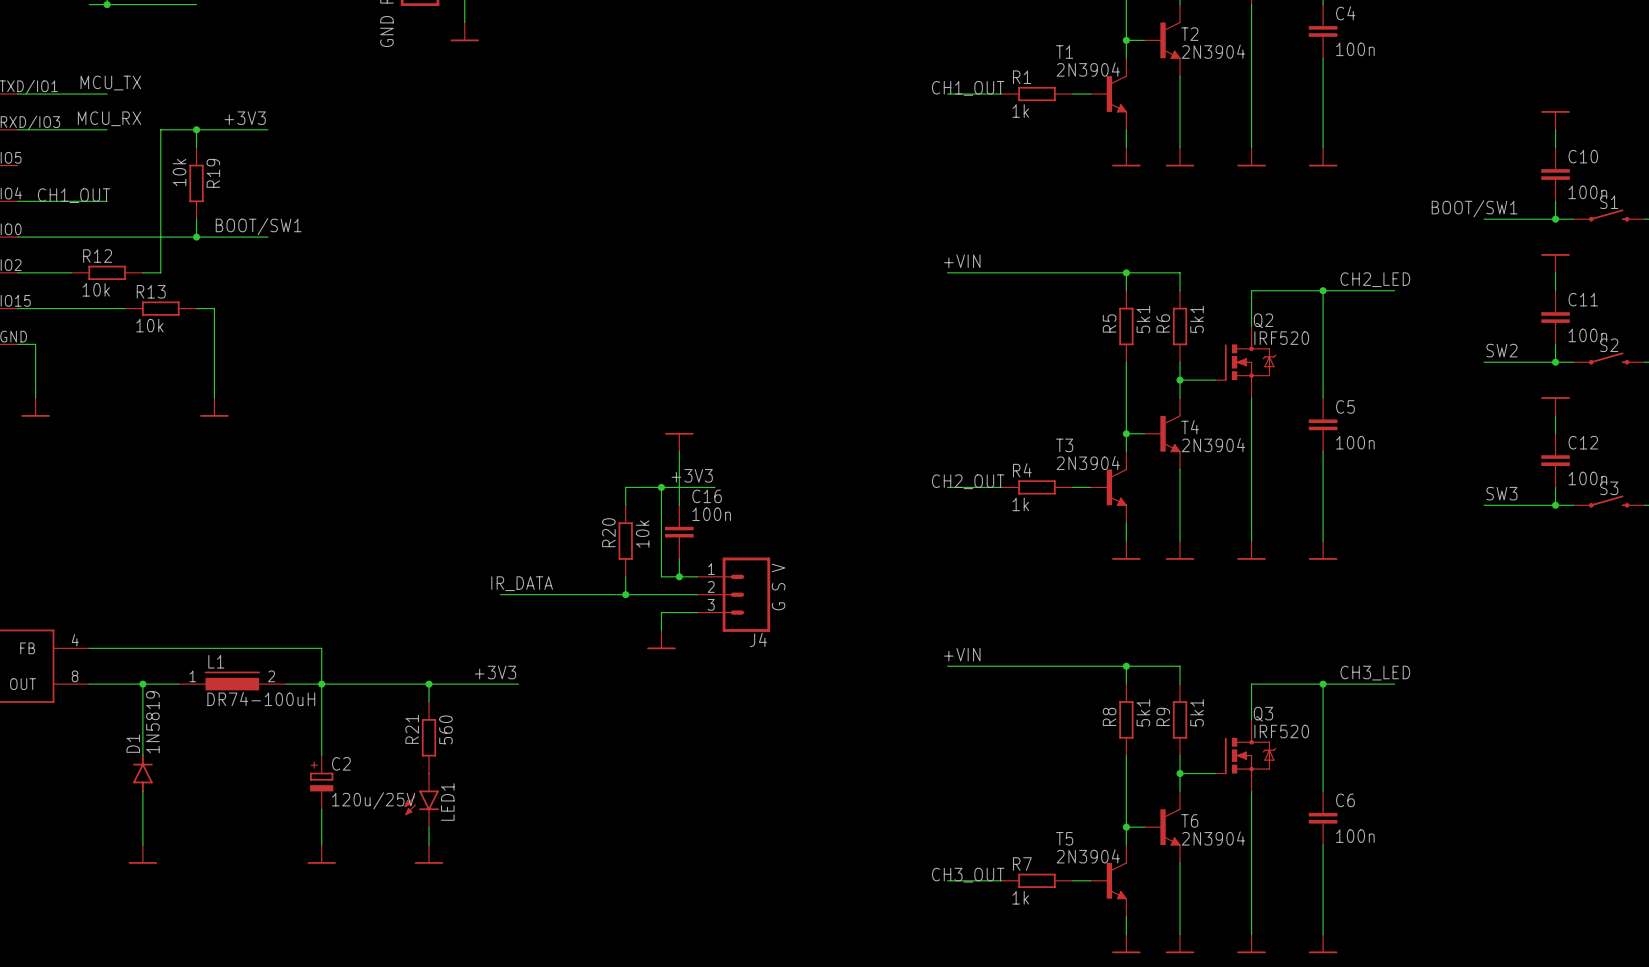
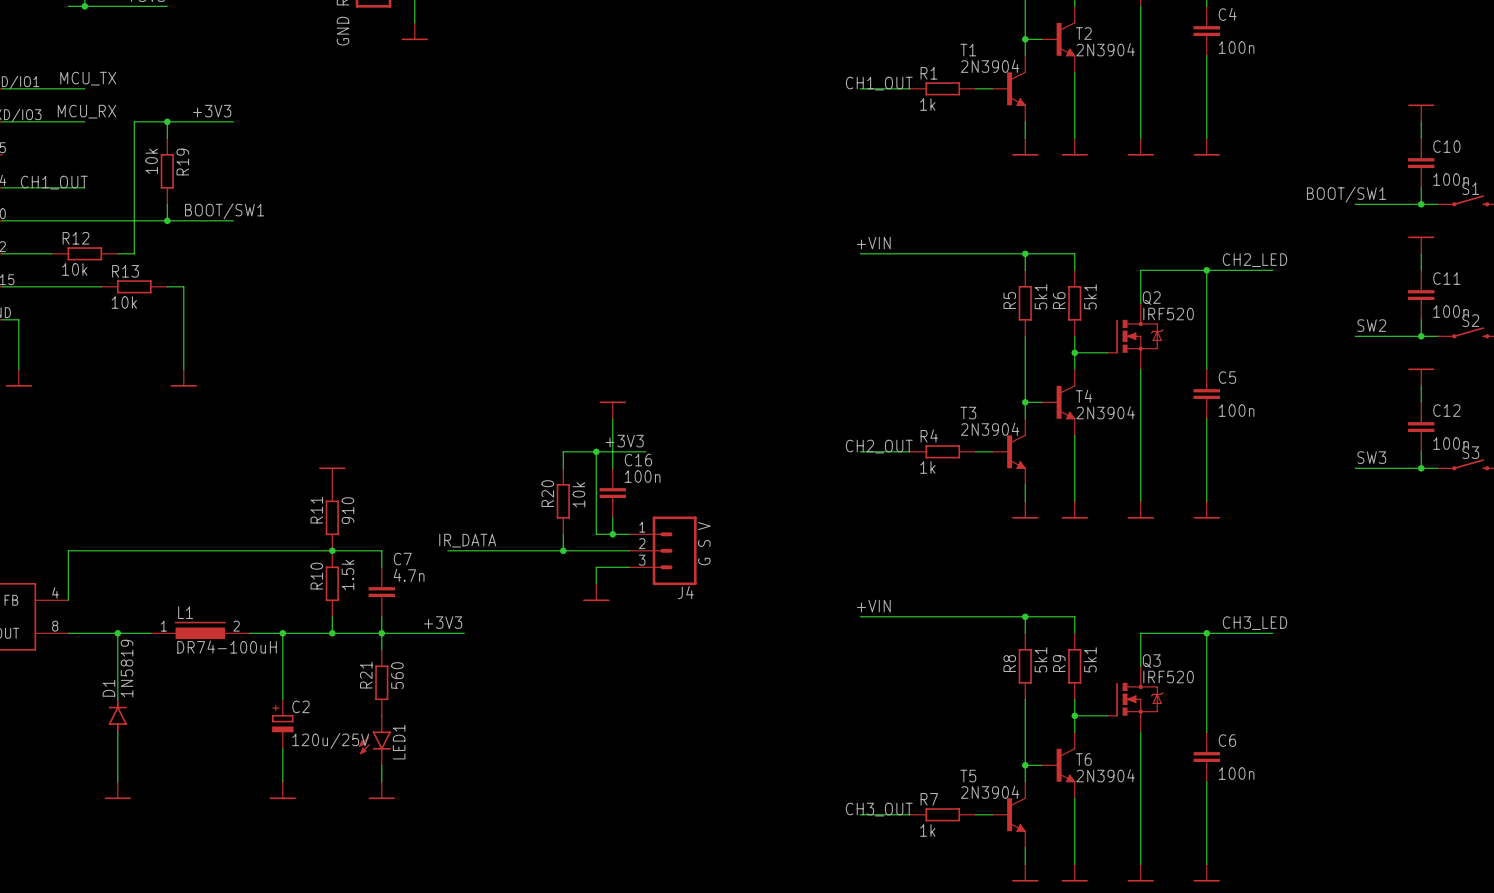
power symbol: none -> (332, 476)
R11: none -> 910 (332, 517)
junction: none -> (332, 550)
R10: none -> 1.5k (332, 583)
C7: none -> 4.7n (381, 592)
wire: (89, 648) (321, 648) (321, 684) -> (68, 600) (68, 550) (381, 550) (381, 567)
wire: none -> (332, 616) (332, 633)
wire: none -> (381, 616) (381, 633)
junction: none -> (332, 633)

